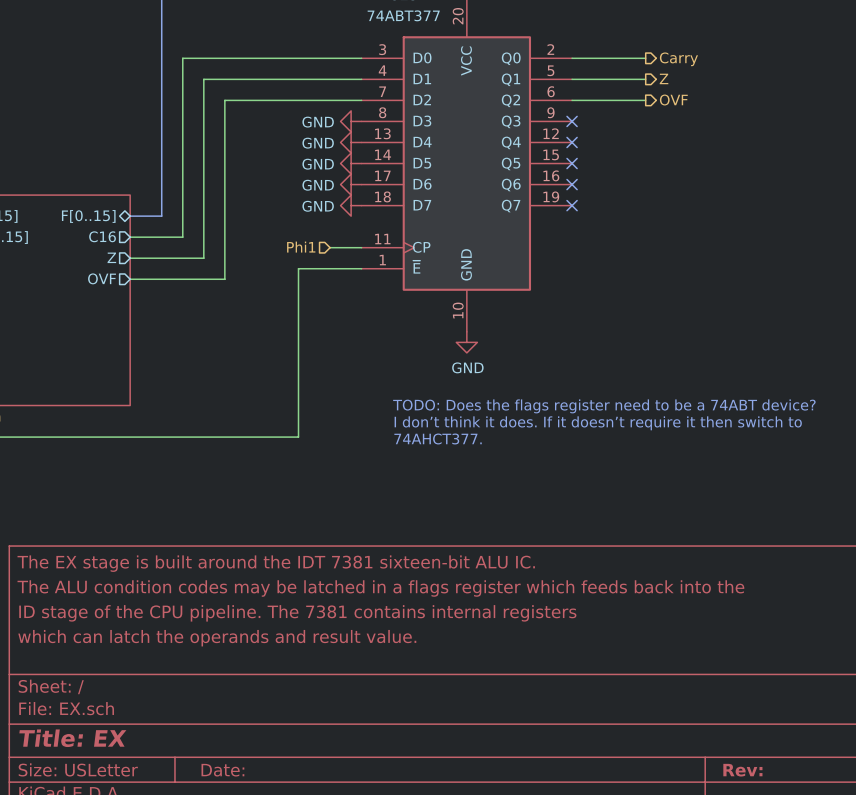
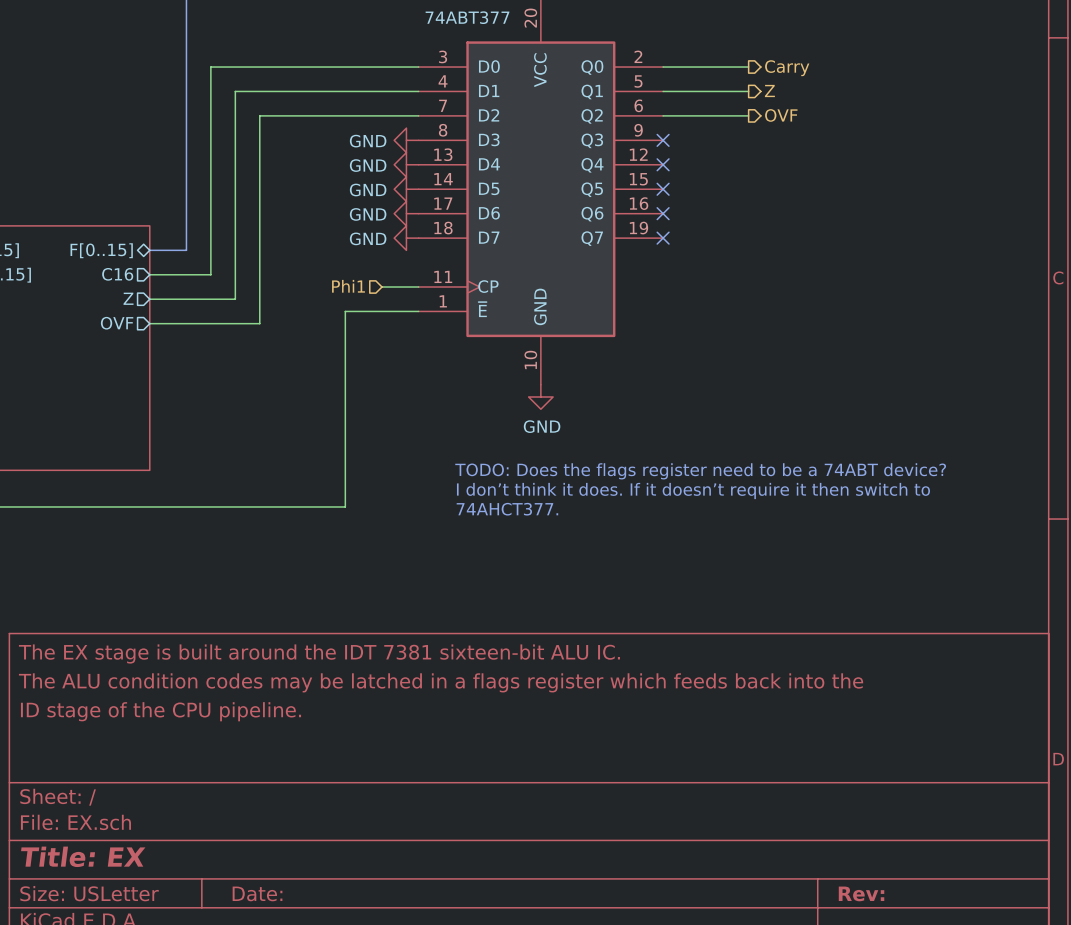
title block: ID stage of the CPU pipeline. The 7381 contains internal registers (297, 613) -> ID stage of the CPU pipeline. (161, 711)
title block: which can latch the operands and result value. (217, 638) -> none

